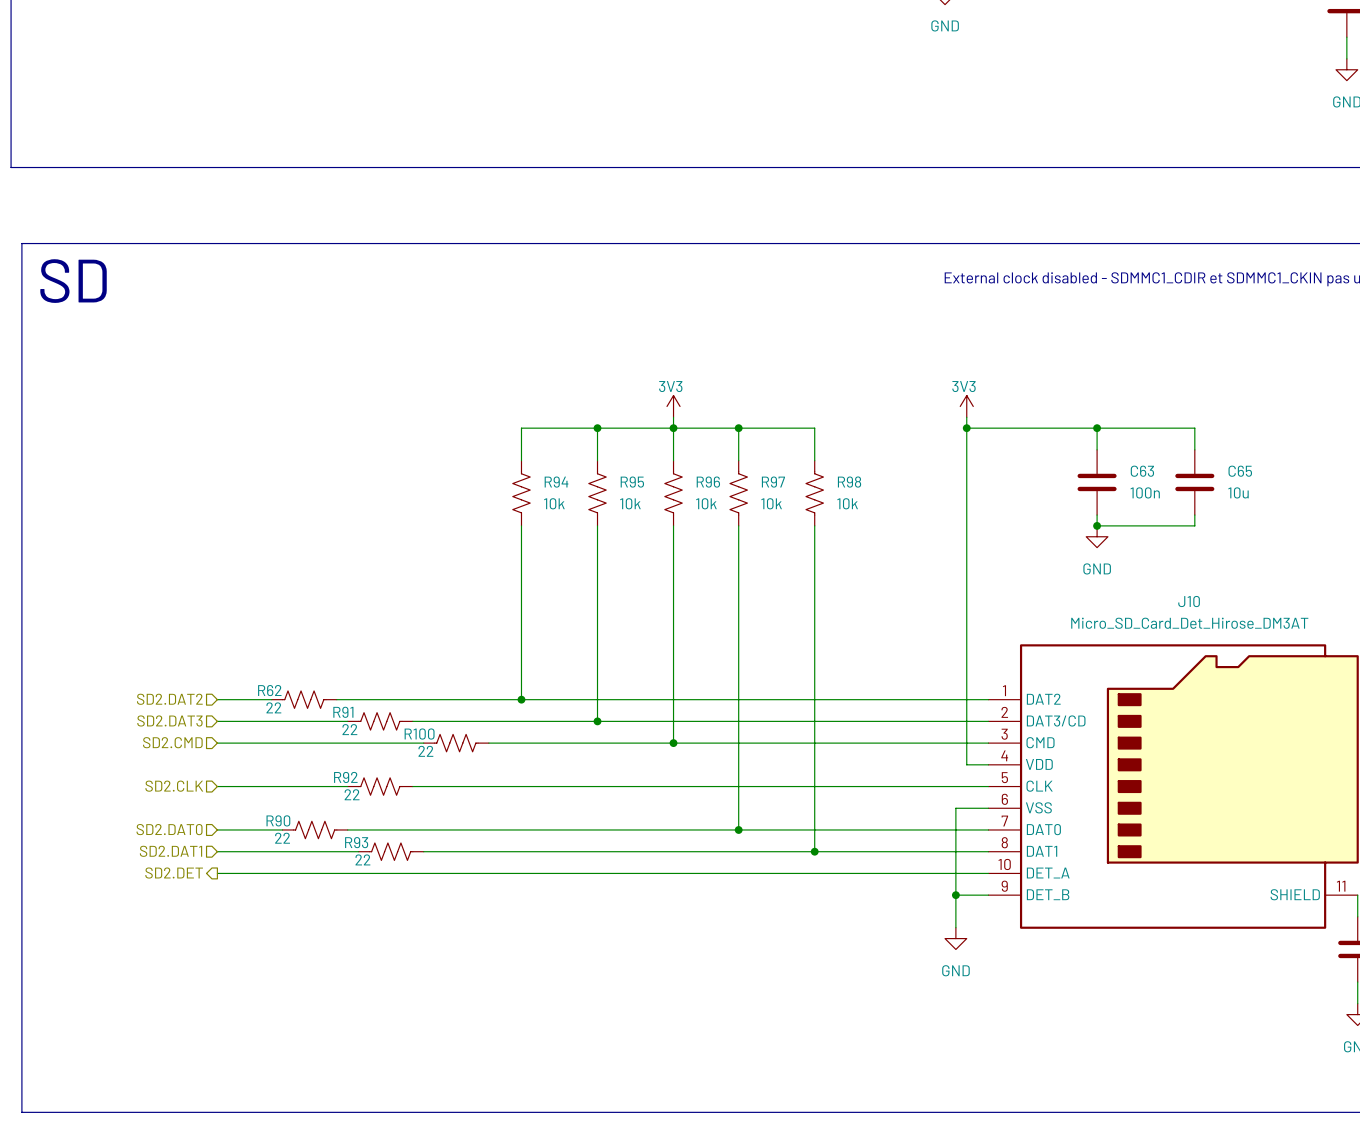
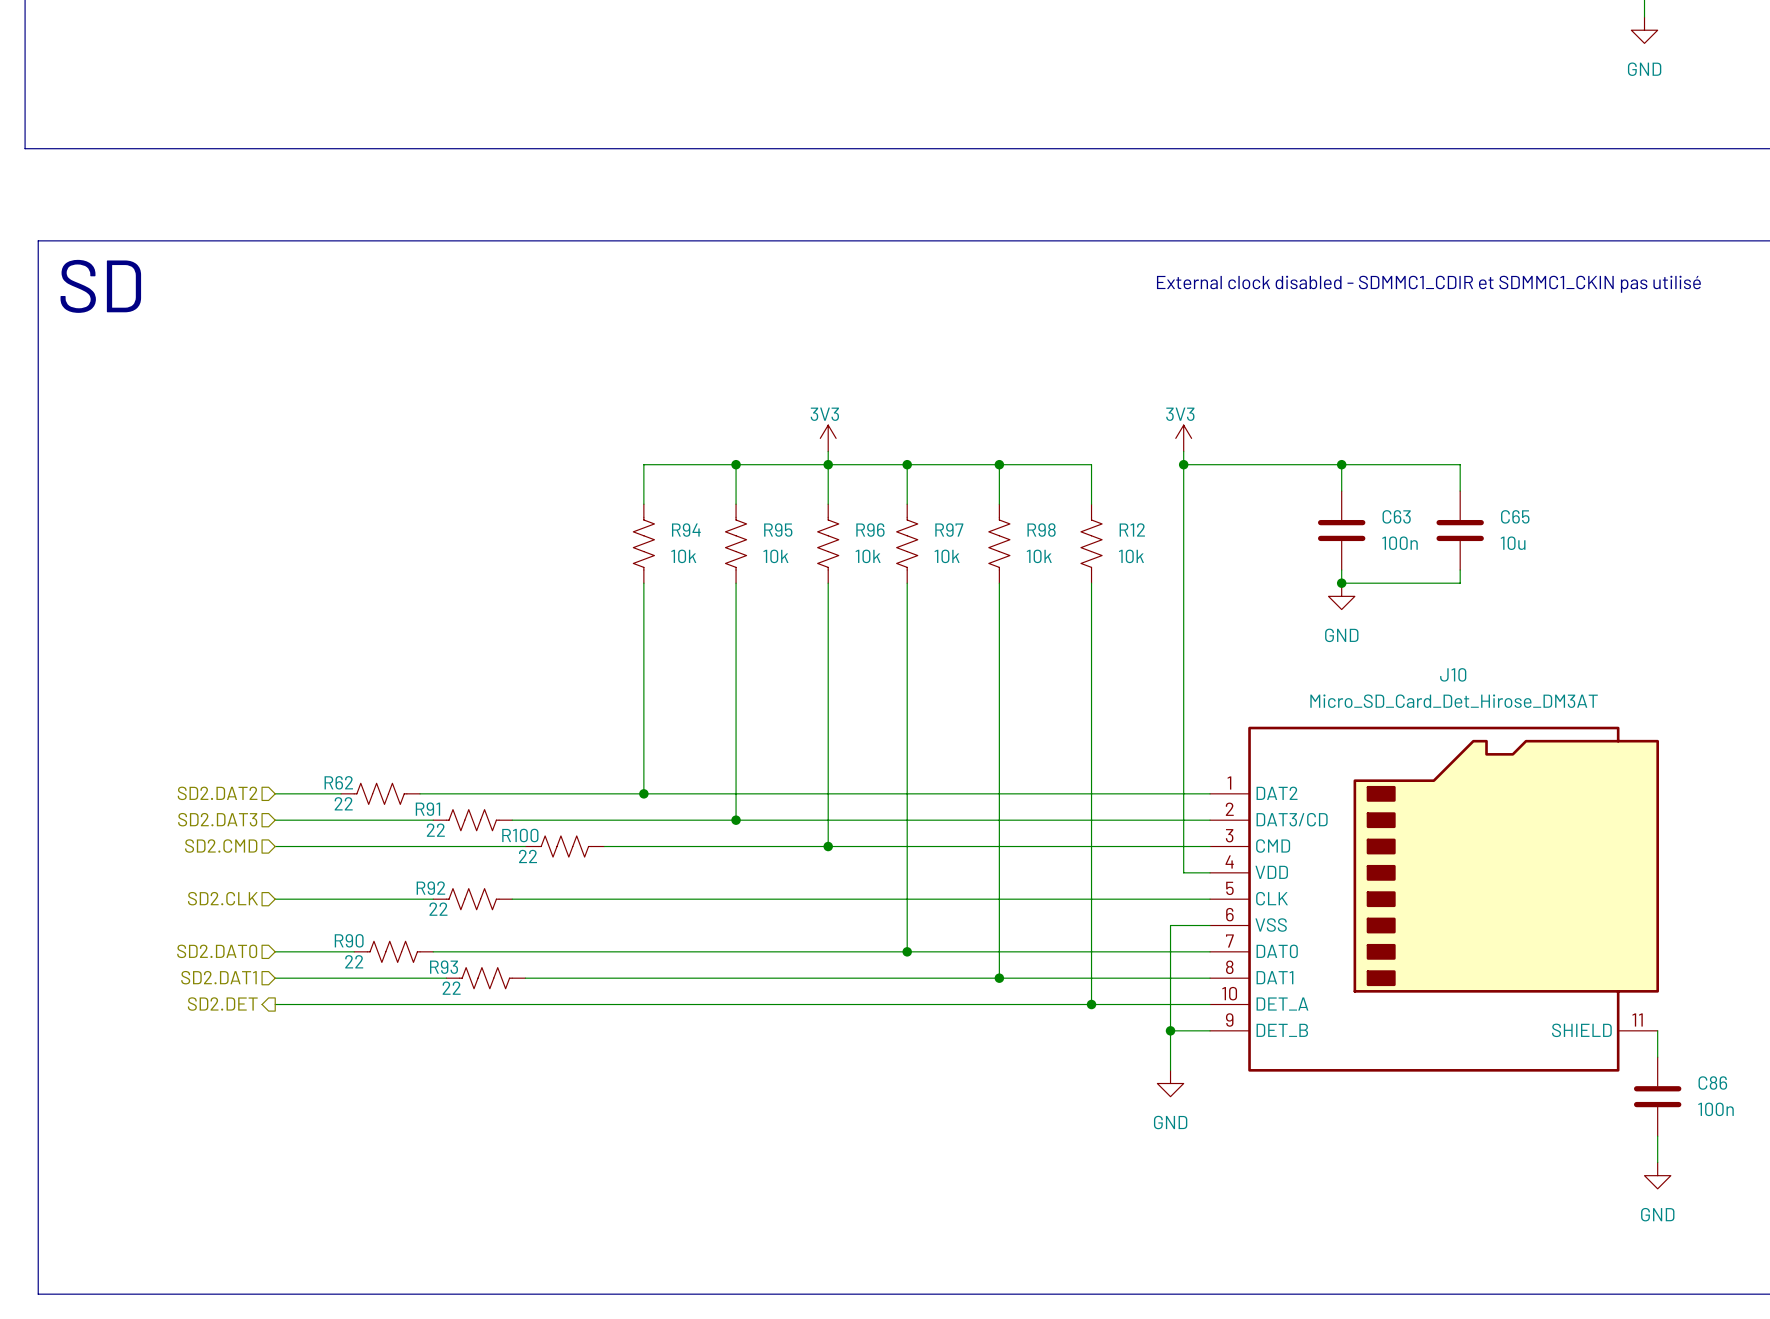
wire: none -> (999, 464) (1091, 464) (1091, 504)
junction: none -> (999, 464)
R12: none -> 10k (1091, 543)
wire: none -> (1091, 583) (1091, 1004)
junction: none -> (1091, 1004)

